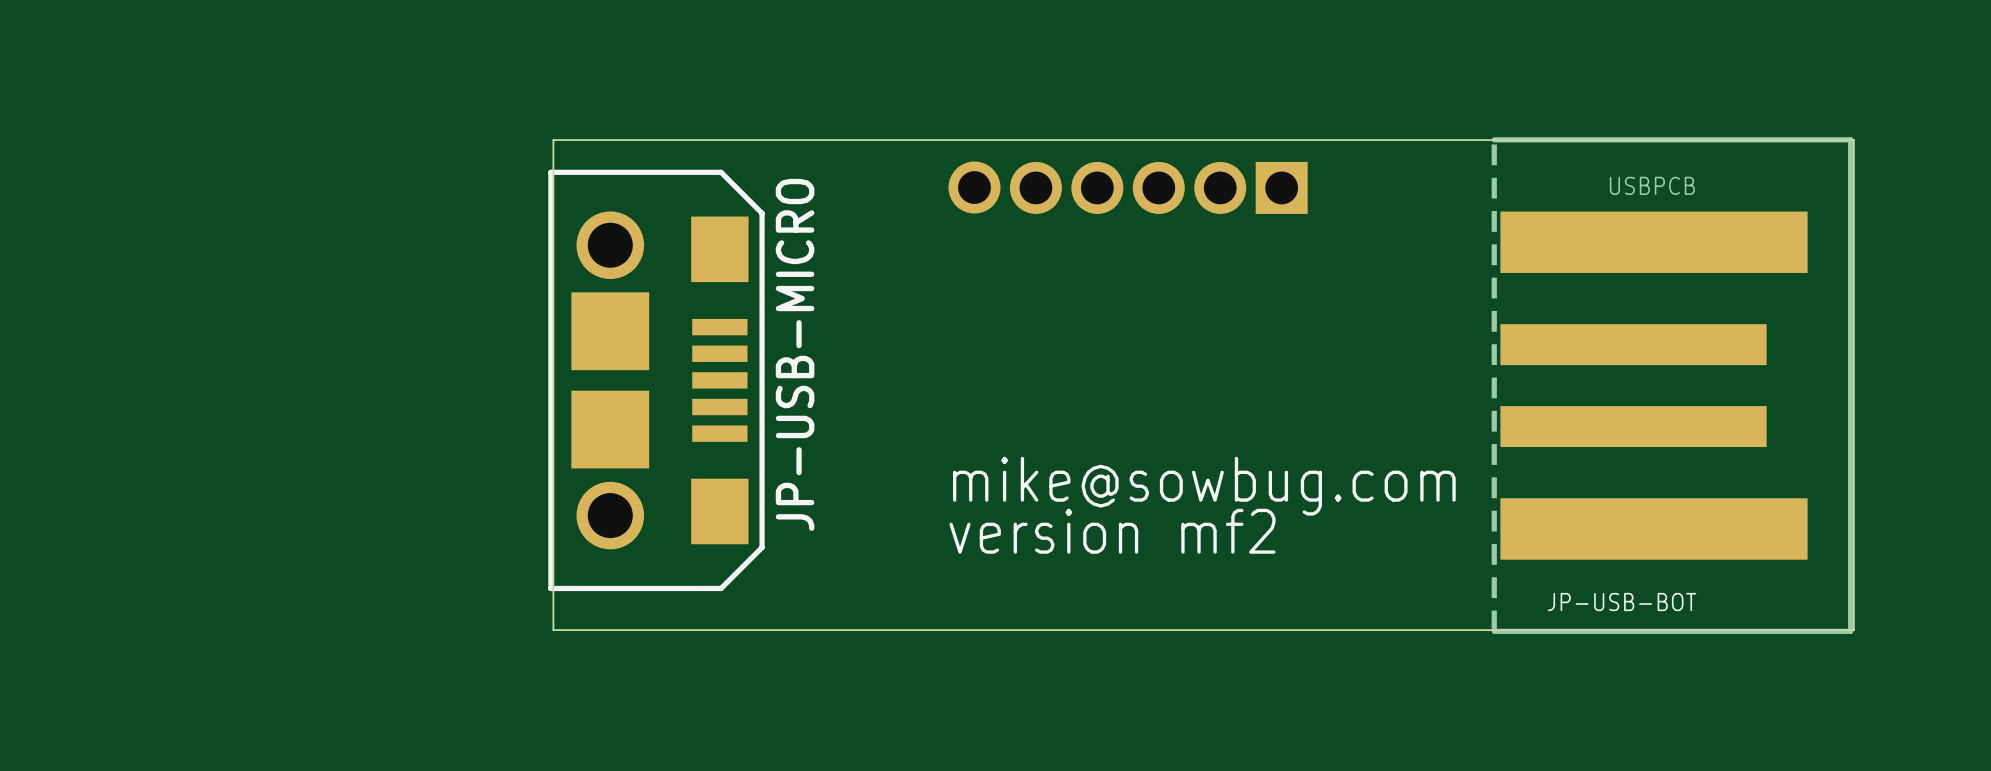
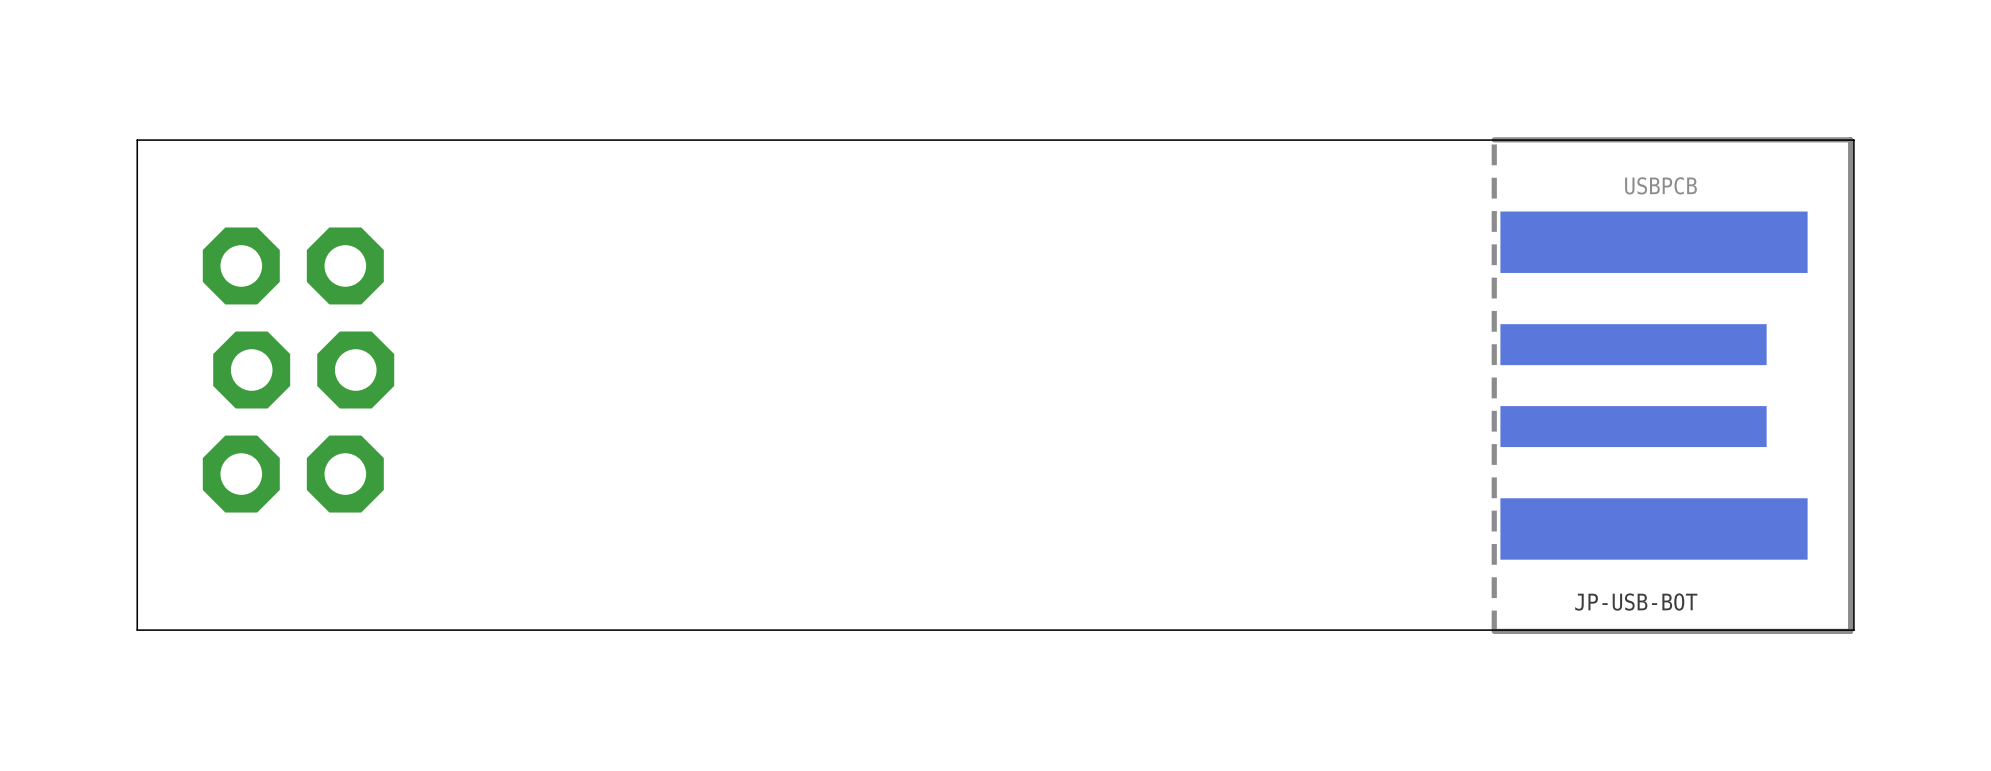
board edge: (553, 140) (553, 630) -> (553, 140) (137, 140) (137, 630) (553, 630)
part: (1128, 187) -> none
part: none -> (298, 370)
JP-USB-MICRO: (656, 380) -> none
text: mike@sowbug.com (1204, 486) -> none
text: version mf2 (1112, 531) -> none

